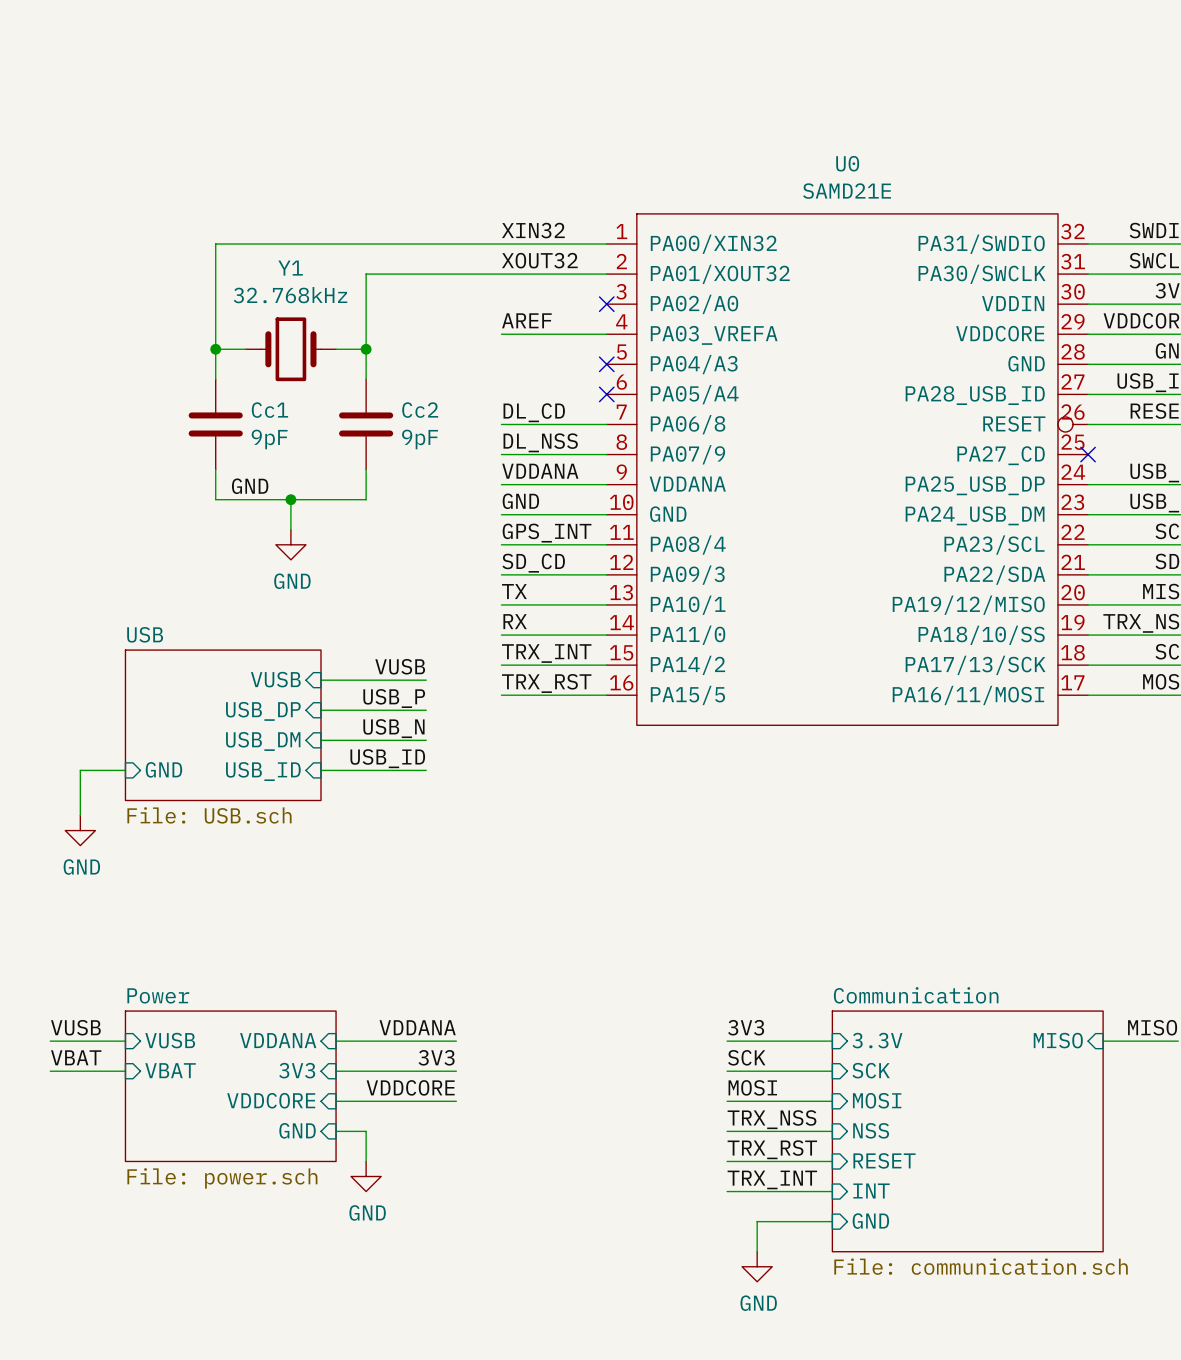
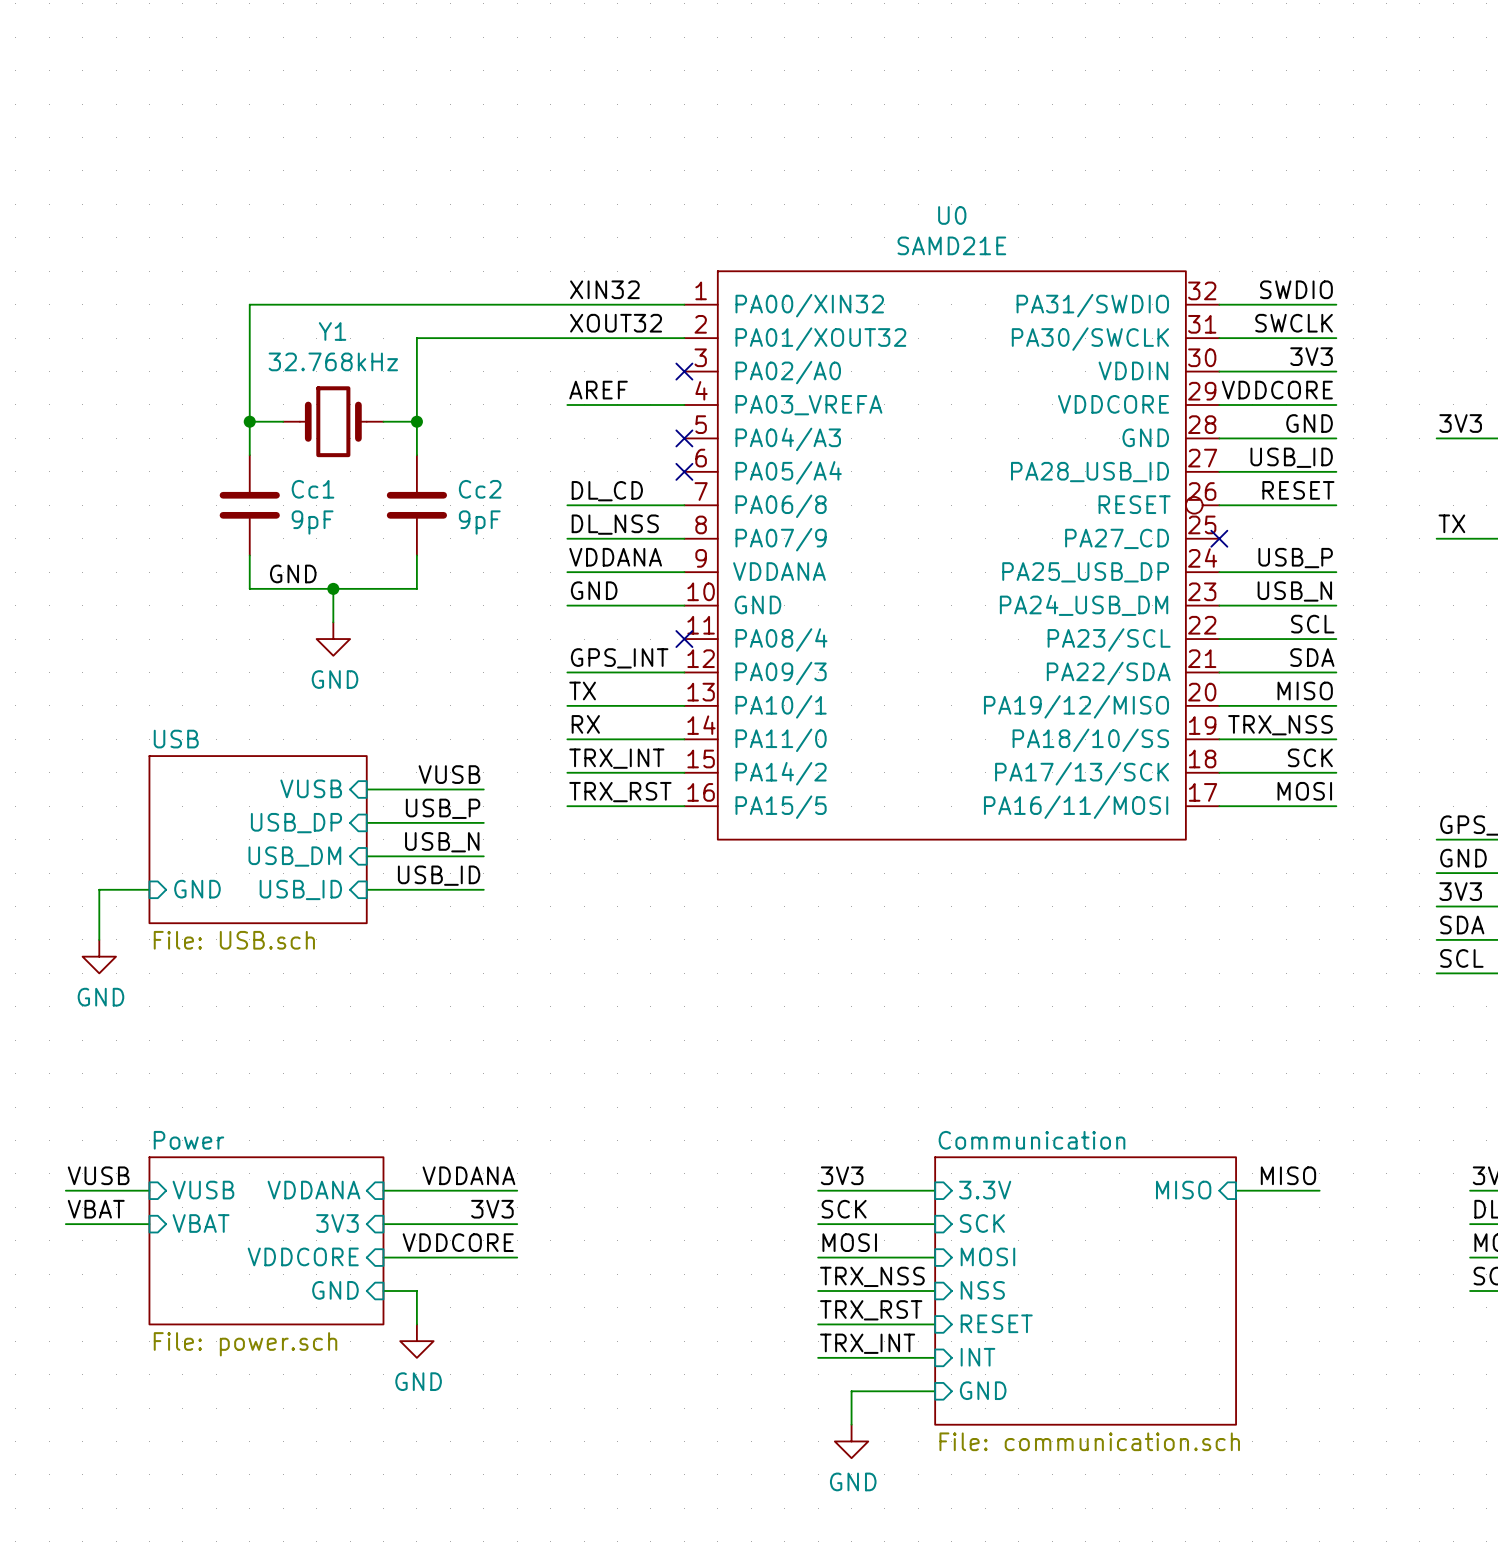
label: GPS_INT (547, 533) -> none
wire: (501, 544) (606, 544) -> none
no-connect mark: none -> (684, 639)
label: SD_CD (533, 563) -> GPS_INT (619, 658)

